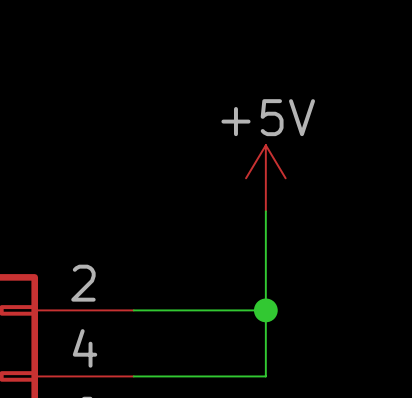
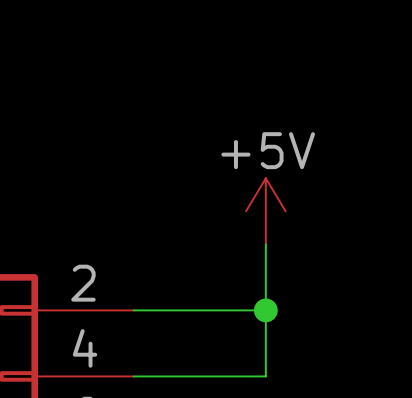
power symbol position: +5V (265, 178) -> +5V (265, 211)

